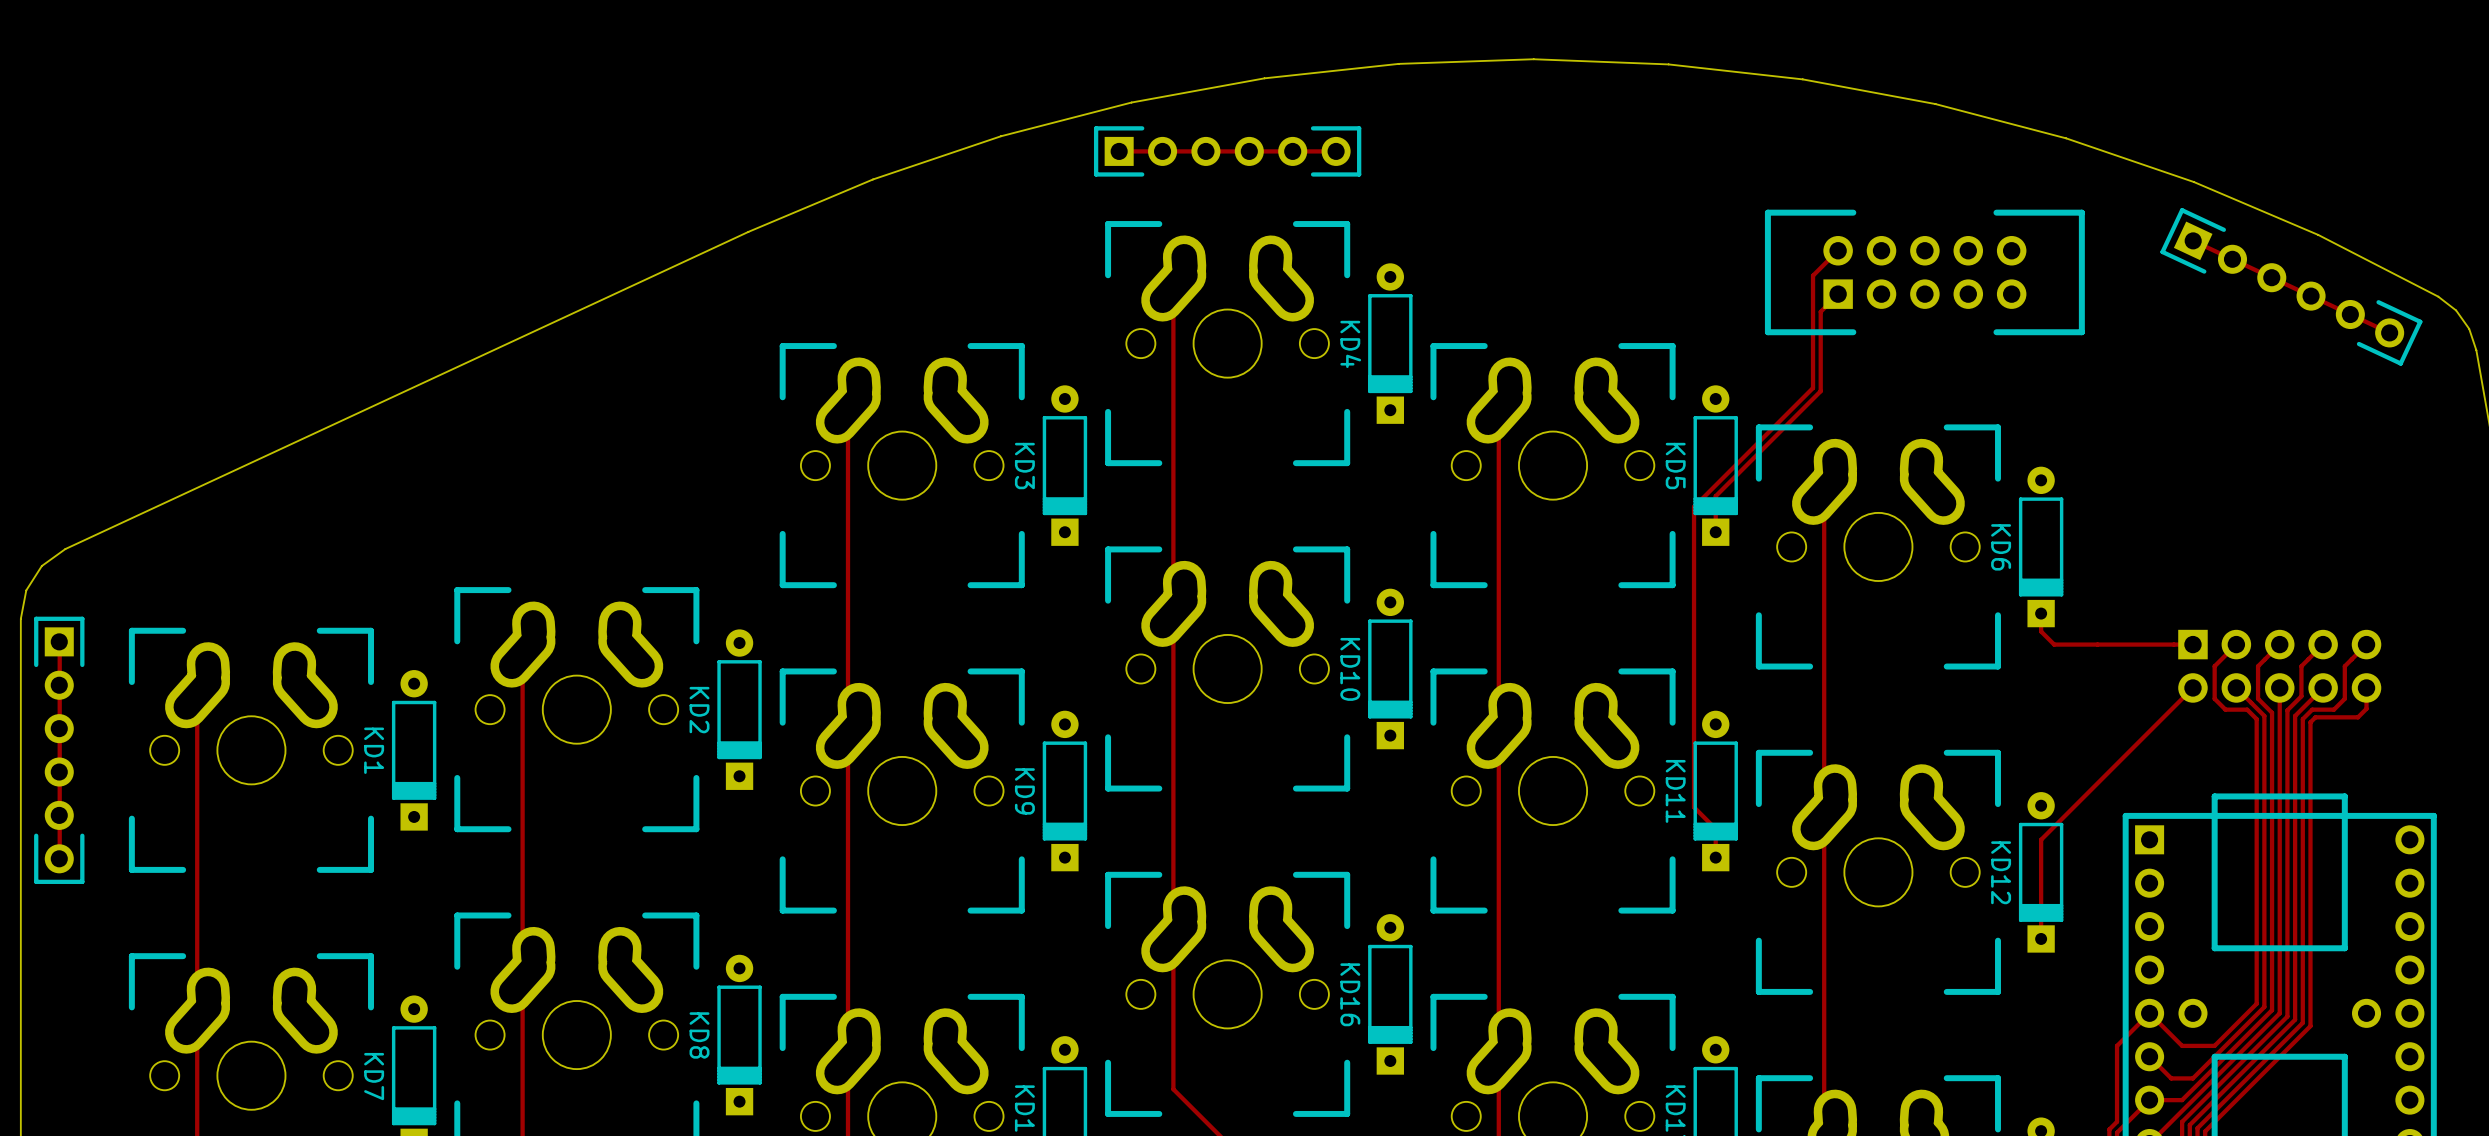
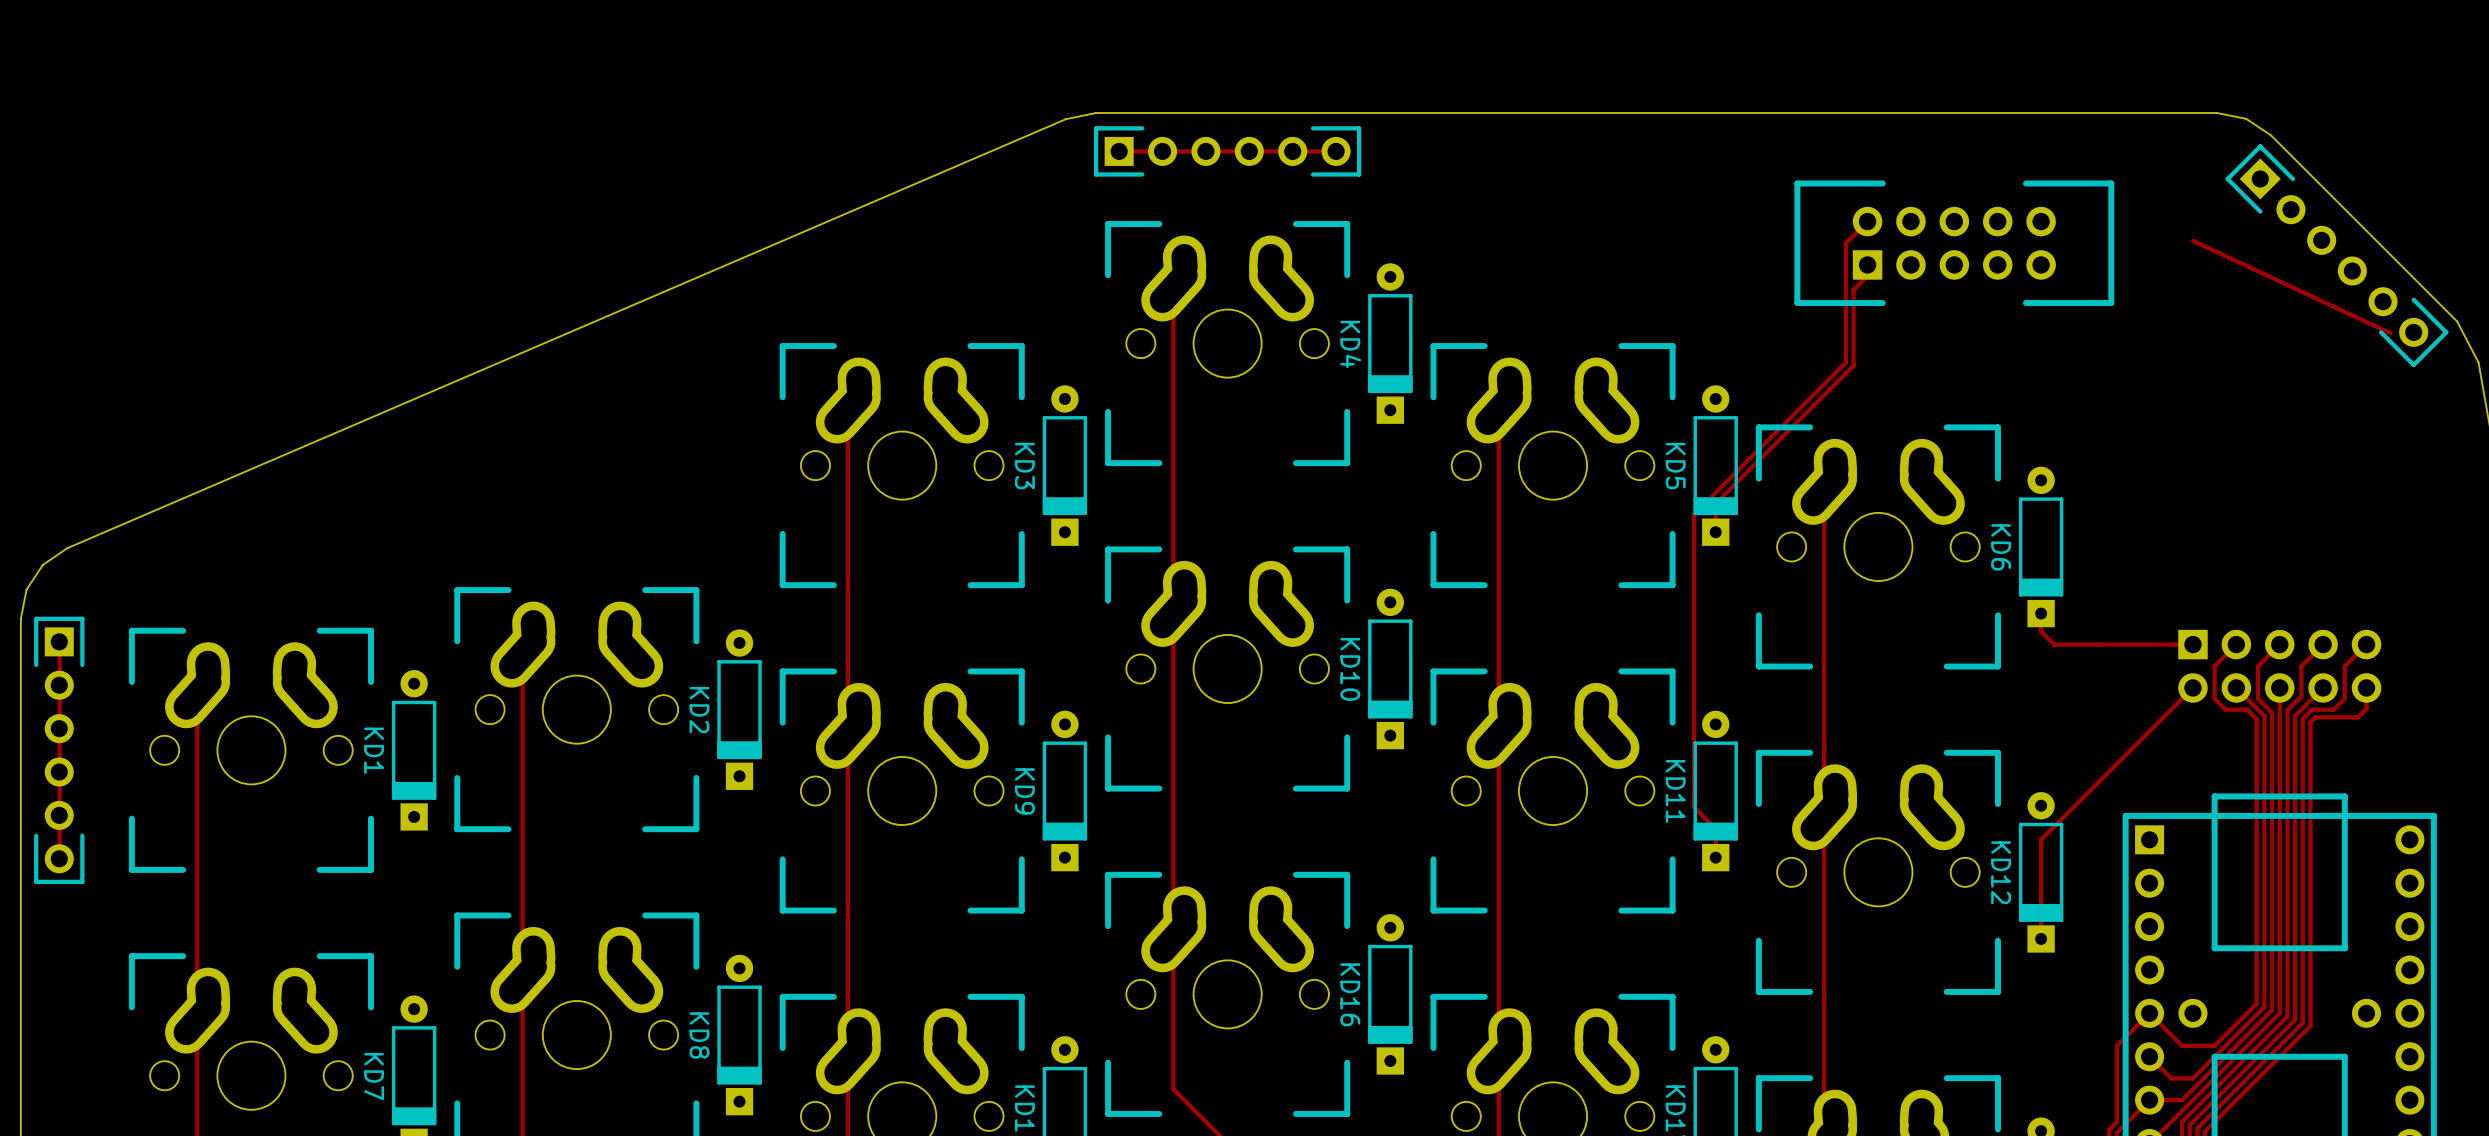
track: (1838, 250) (1813, 275) (1813, 388) (1694, 507) (1694, 514) -> (1867, 221) (1845, 243) (1845, 362) (1694, 514)
part: none -> (2337, 255)
part position: (1924, 272) -> (1954, 243)
part: (2291, 286) -> none
track: (1838, 294) (1820, 311) (1820, 391) (1715, 496) (1715, 503) -> (1867, 264) (1867, 275) (1853, 289) (1853, 365) (1715, 503)
board edge: (2478, 362) (2469, 328) (2456, 310) (2438, 296) (2318, 234) (2193, 182) (2066, 138) (1935, 104) (1802, 79) (1668, 64) (1533, 59) (1398, 63) (1264, 78) (1131, 102) (1000, 136) (872, 179) (748, 231) (65, 549) (41, 566) (26, 590) (20, 618) -> (2478, 362) (2457, 321) (2271, 135) (2246, 118) (2216, 112) (1096, 112) (1065, 119) (67, 548) (42, 564) (26, 589) (20, 618)

